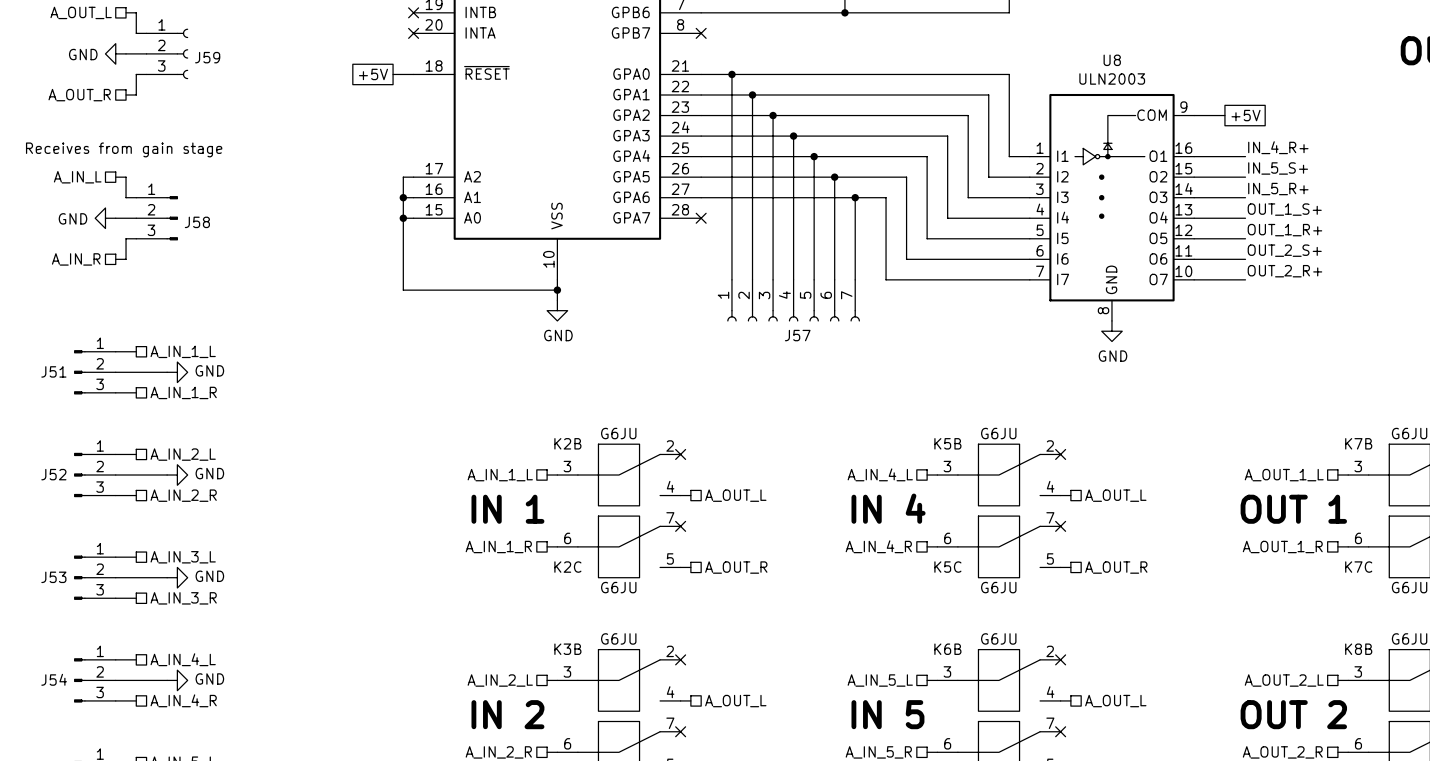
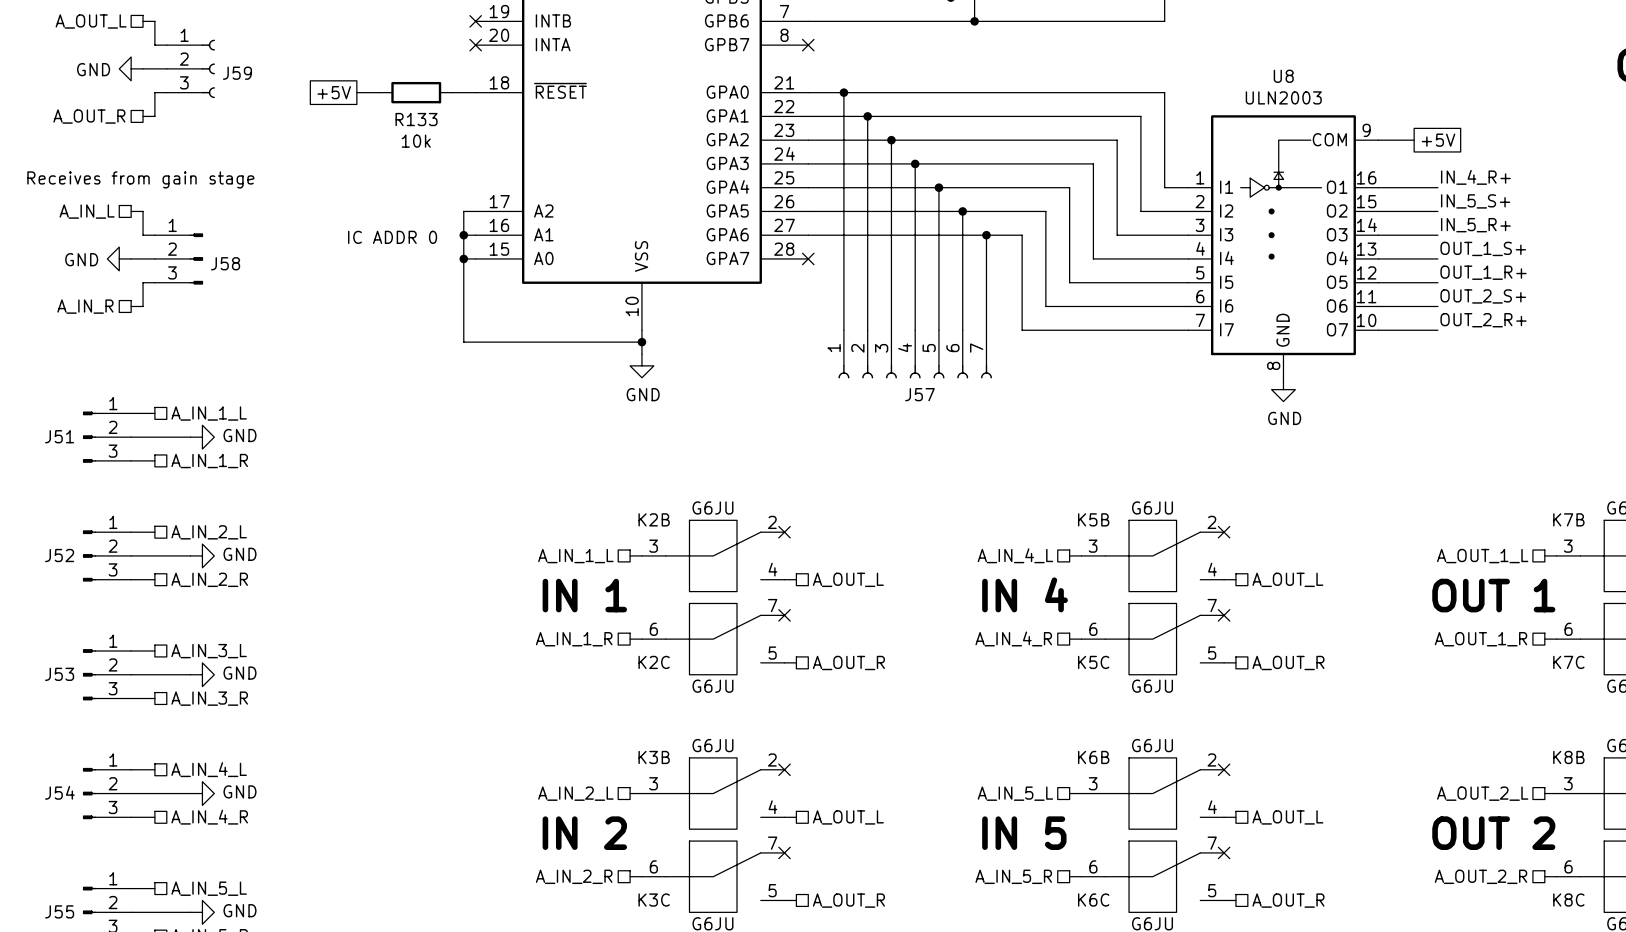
wire: none -> (356, 92) (380, 92)
R133: none -> 10k (416, 92)
global label position: +5V (373, 74) -> +5V (334, 92)
text: none -> IC ADDR 0 (392, 237)

